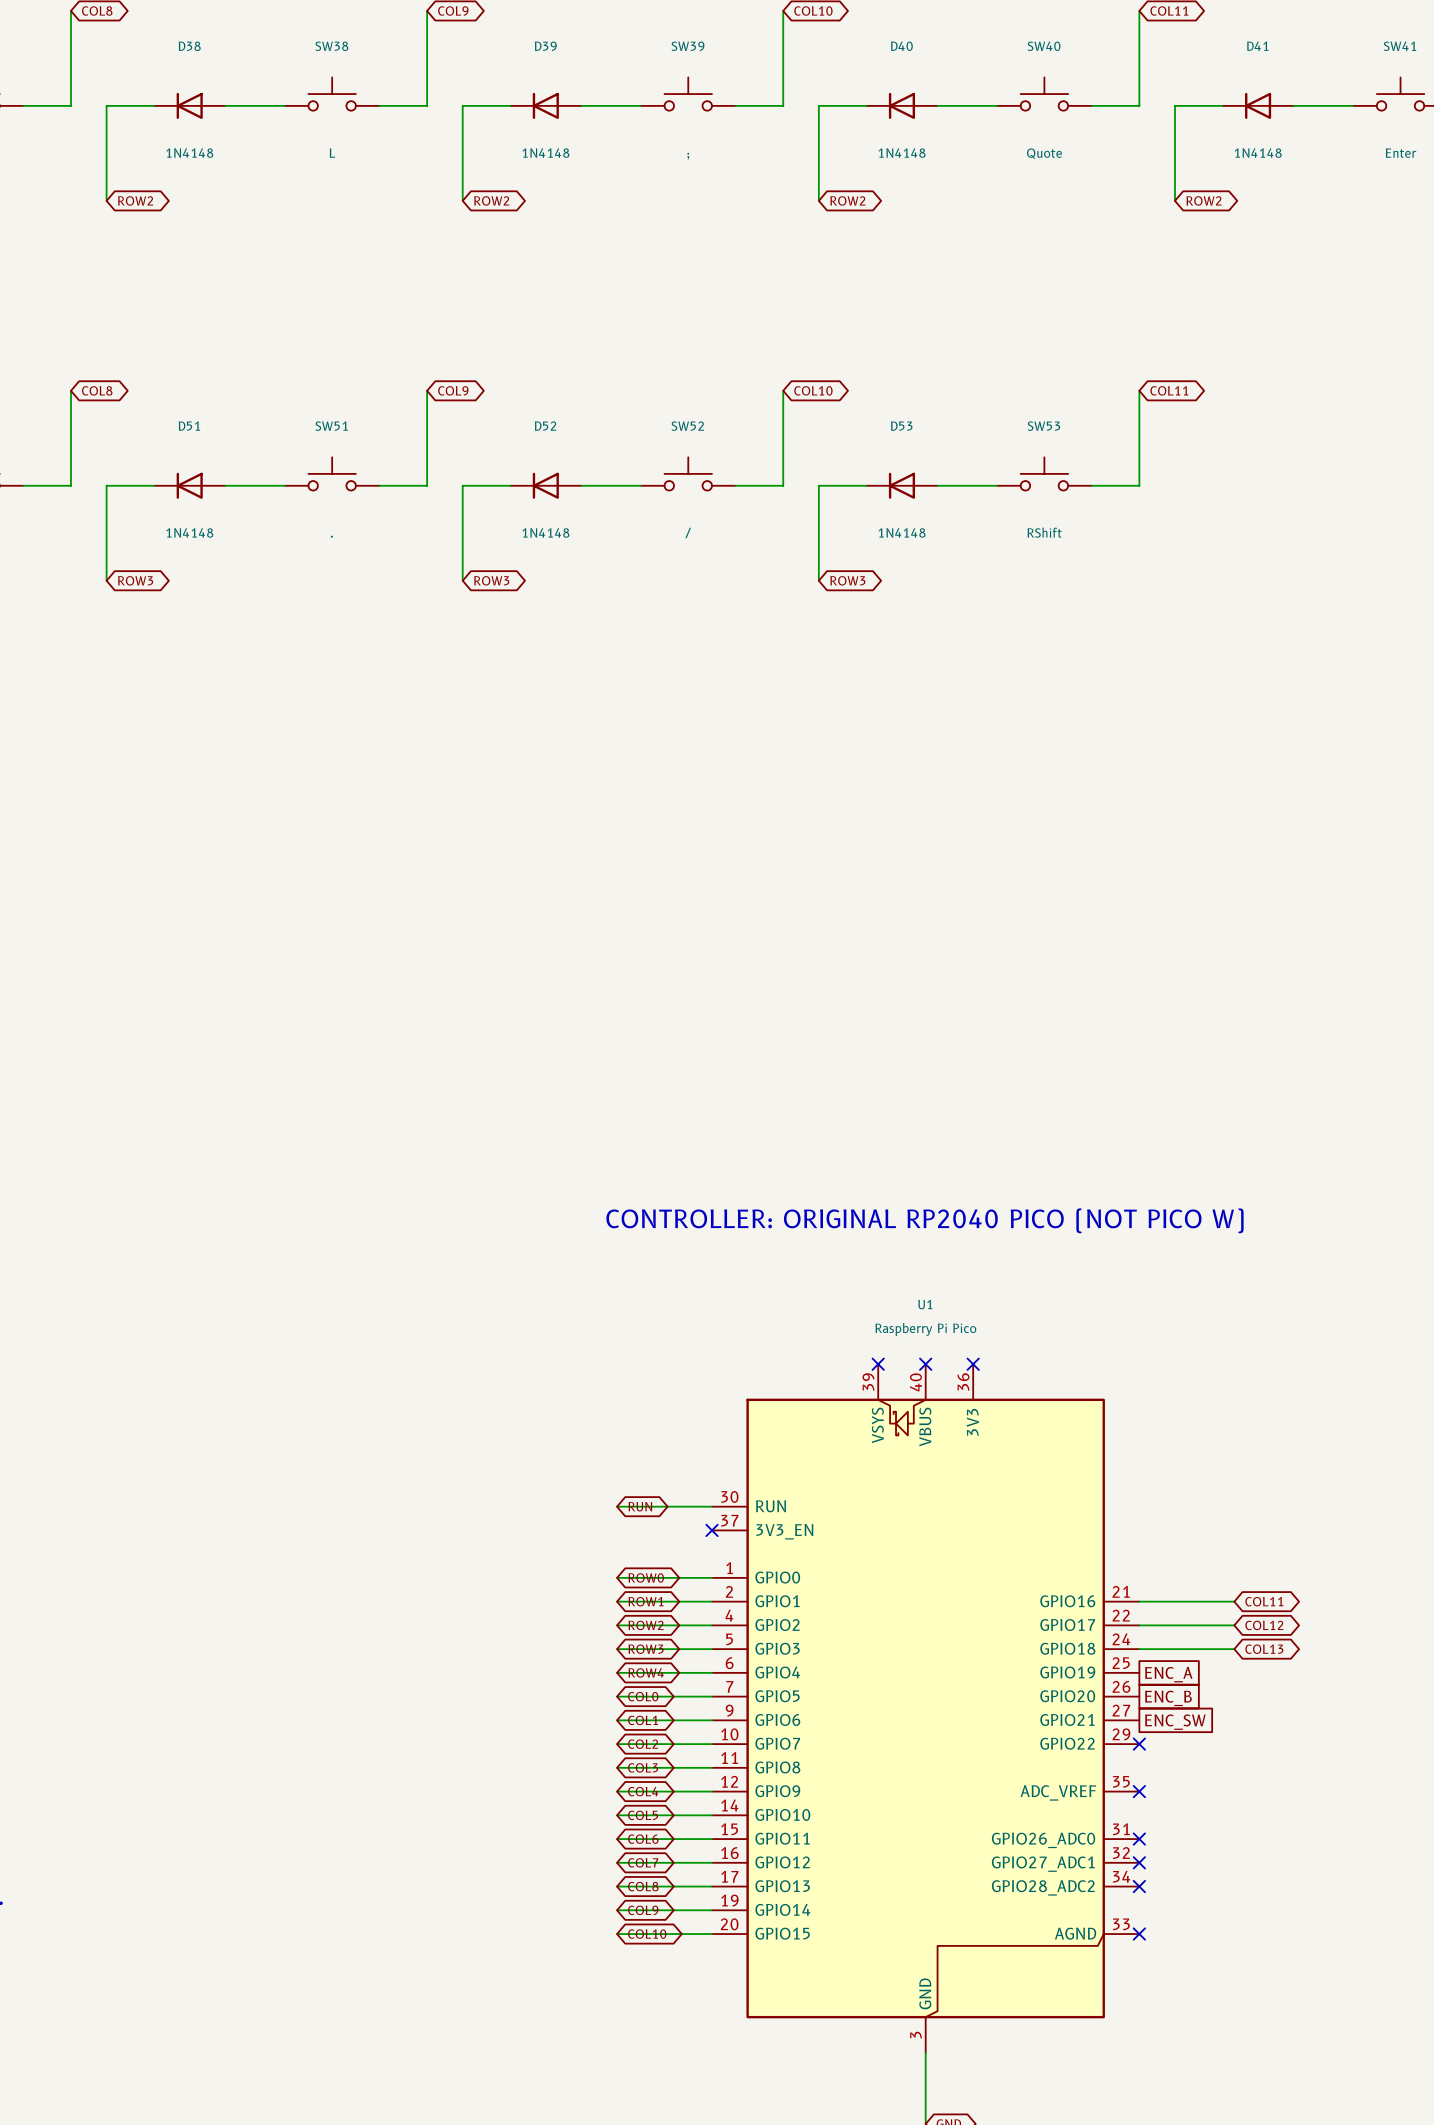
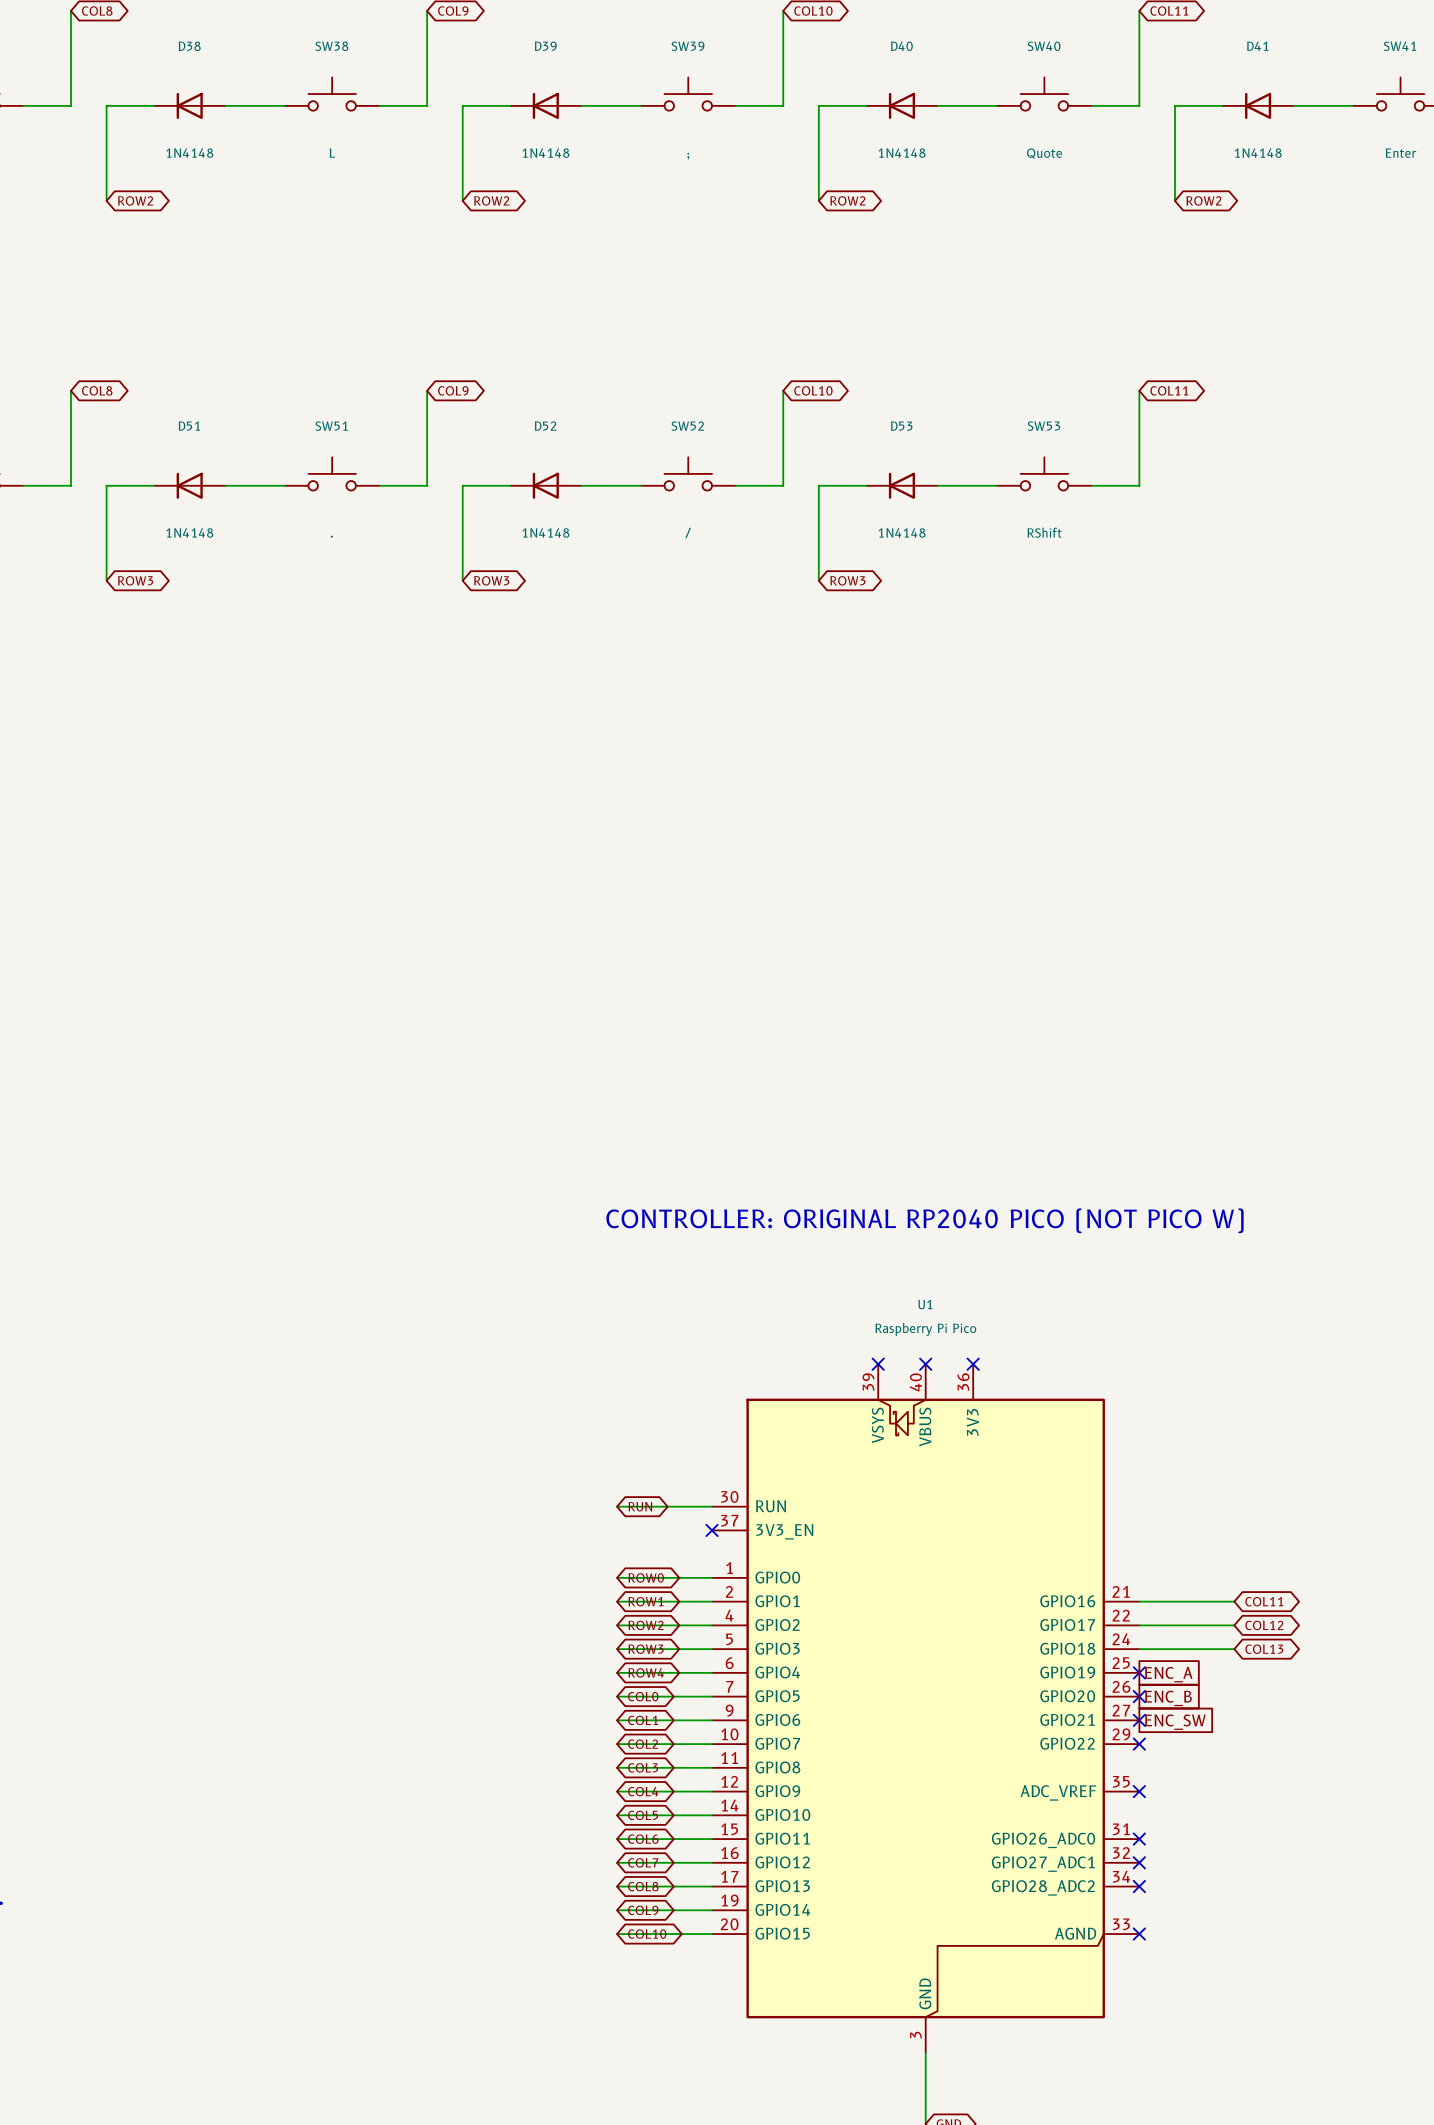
no-connect mark: none -> (1139, 1672)
no-connect mark: none -> (1139, 1696)
no-connect mark: none -> (1139, 1720)

